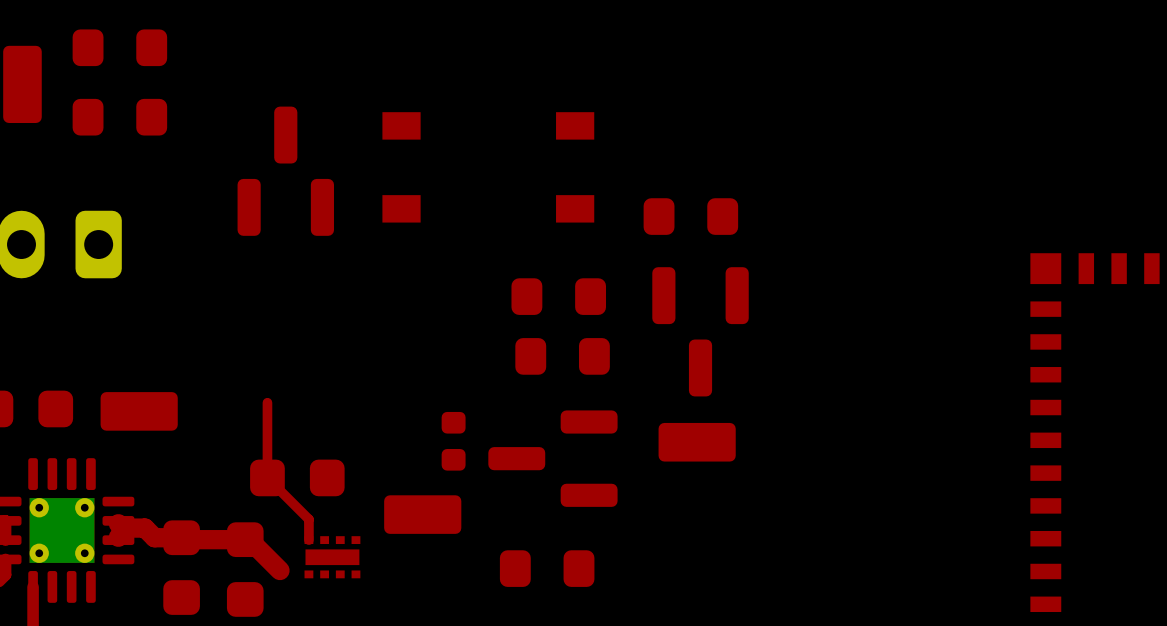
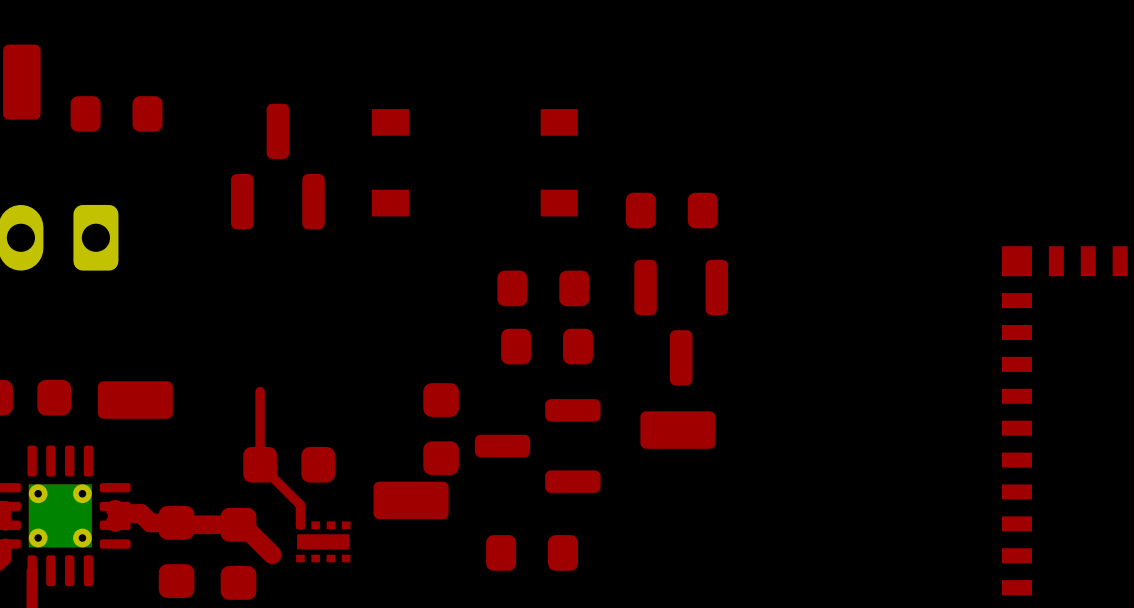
part: (119, 47) -> none
part footprint: [441, 411, 466, 471] -> [423, 383, 459, 476]

